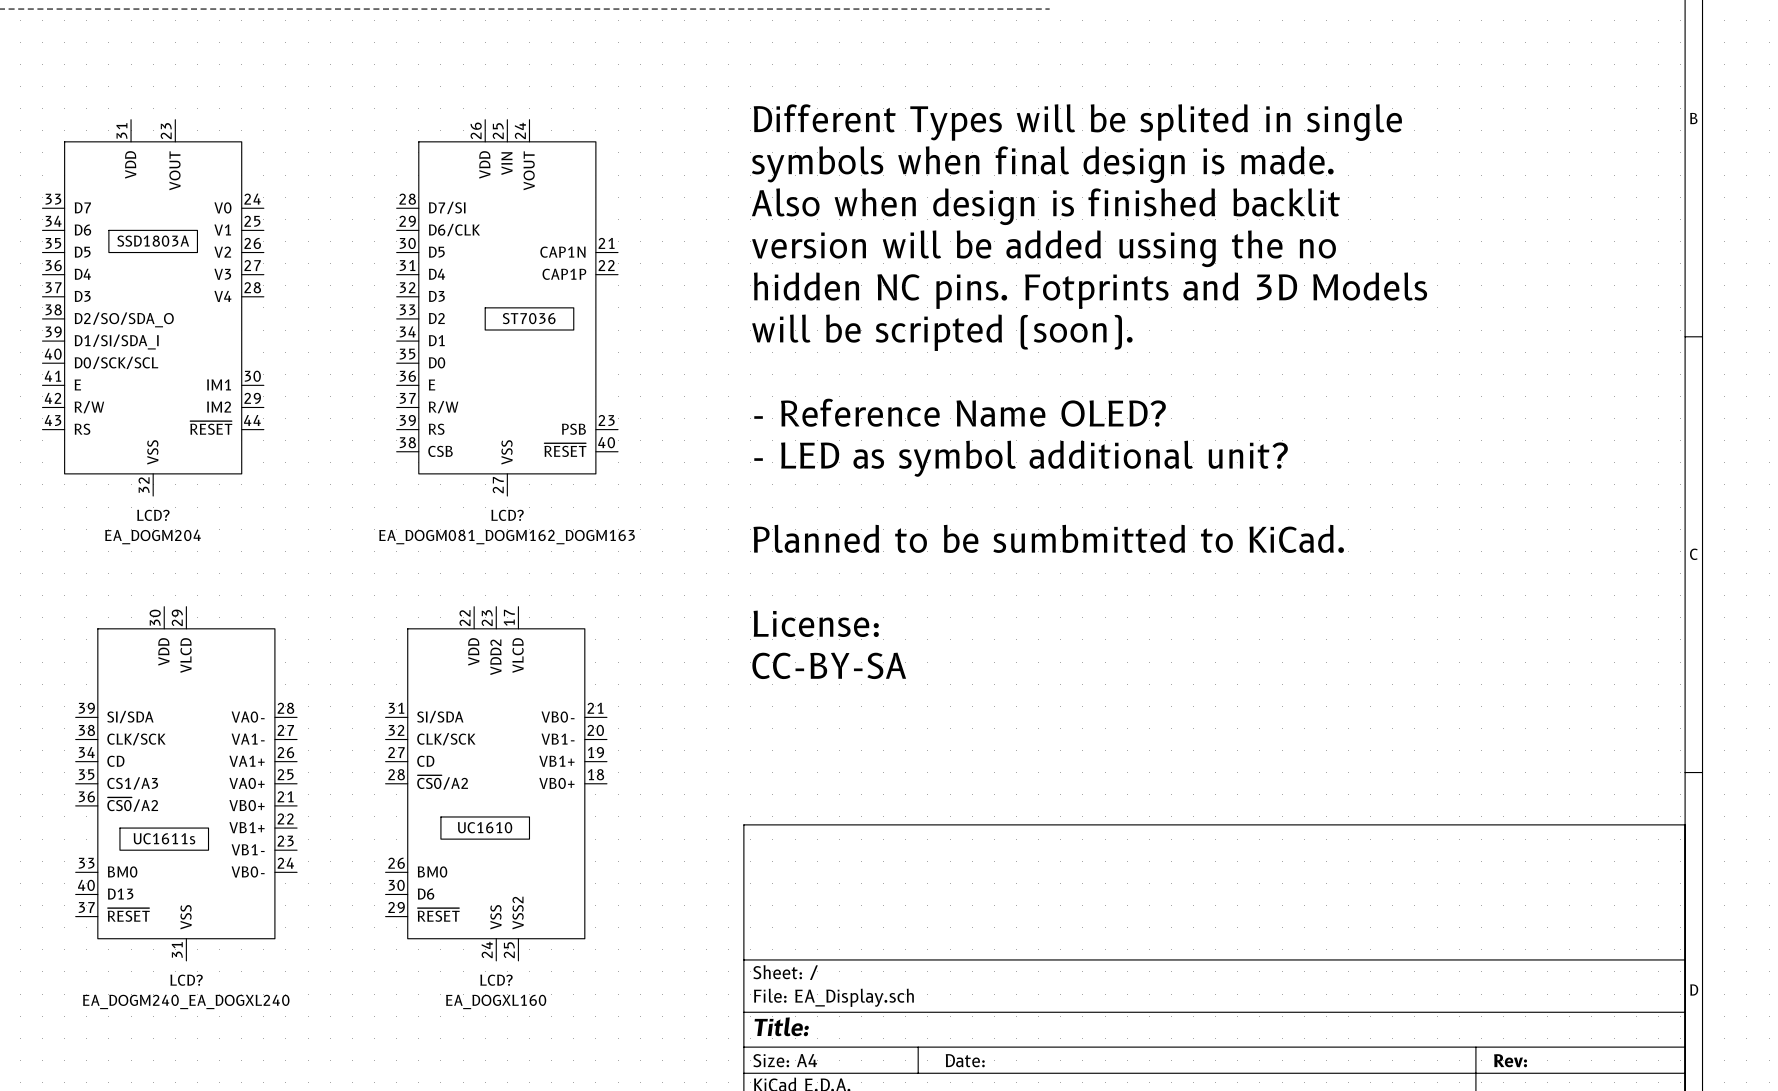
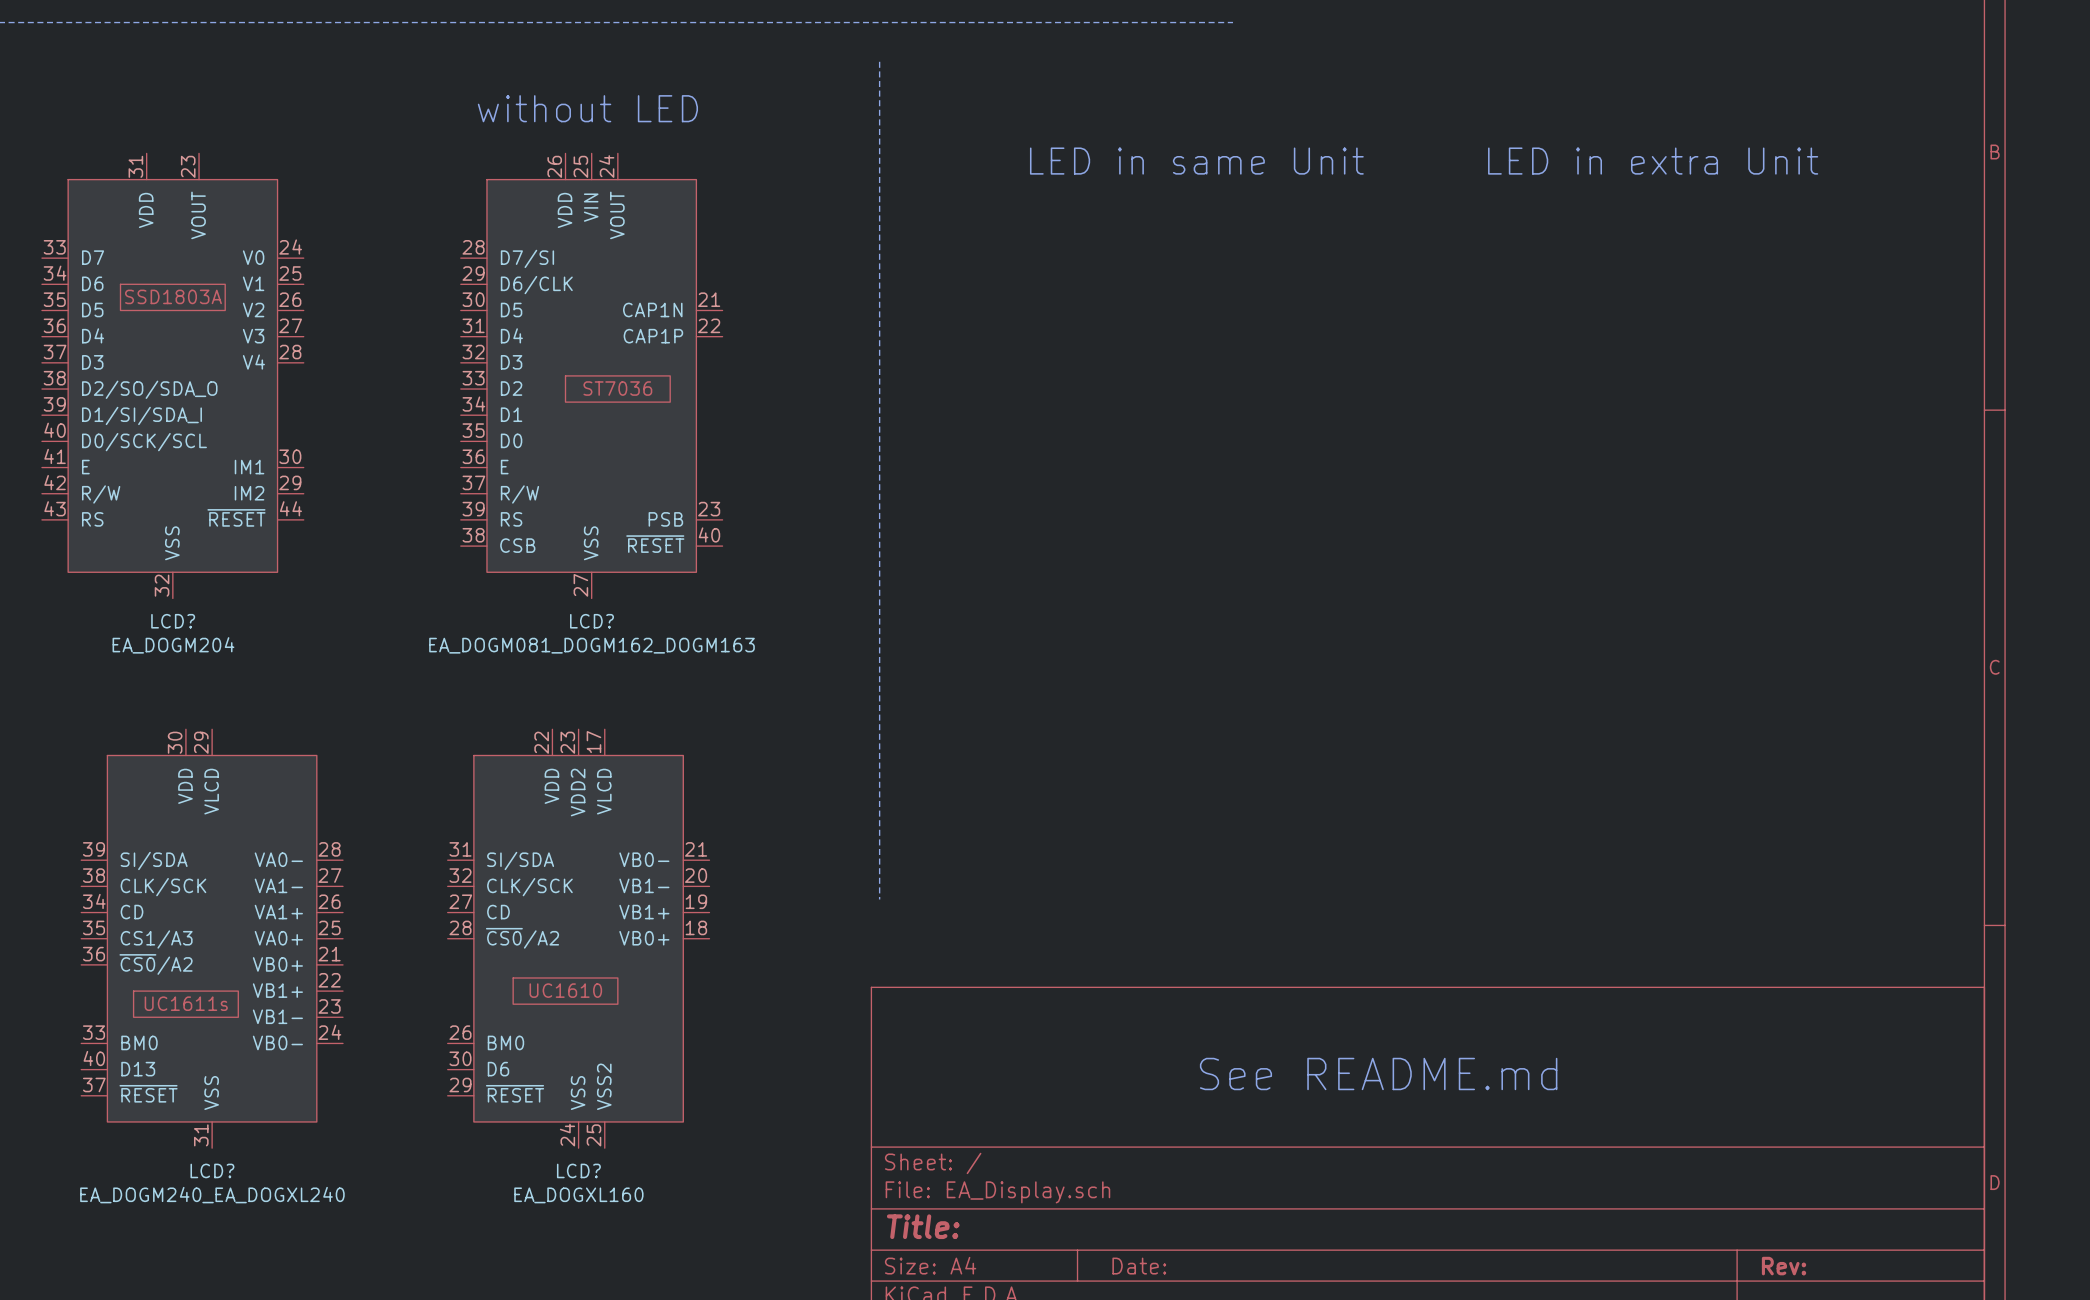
line: none -> (879, 61) (879, 899)
text: none -> without LED (587, 108)
text: Different Types will be splited in single (1077, 122) -> none
text: none -> LED in same Unit (1196, 161)
text: none -> LED in extra Unit (1653, 161)
text: symbols when final design is made. (1042, 164) -> none
text: Also when design is finished backlit (1045, 206) -> none
text: version will be added ussing the no (1044, 248) -> none
text: hidden NC pins. Fotprints and 3D Models (1090, 290) -> none
text: will be scripted (soon). (942, 332) -> none
text: - Reference Name OLED? (960, 412) -> none
text: - LED as symbol additional unit? (1021, 458) -> none
text: Planned to be sumbmitted to KiCad. (1048, 538) -> none
text: License: (816, 623) -> none
text: CC-BY-SA (829, 665) -> none
text: none -> See README.md (1378, 1073)

